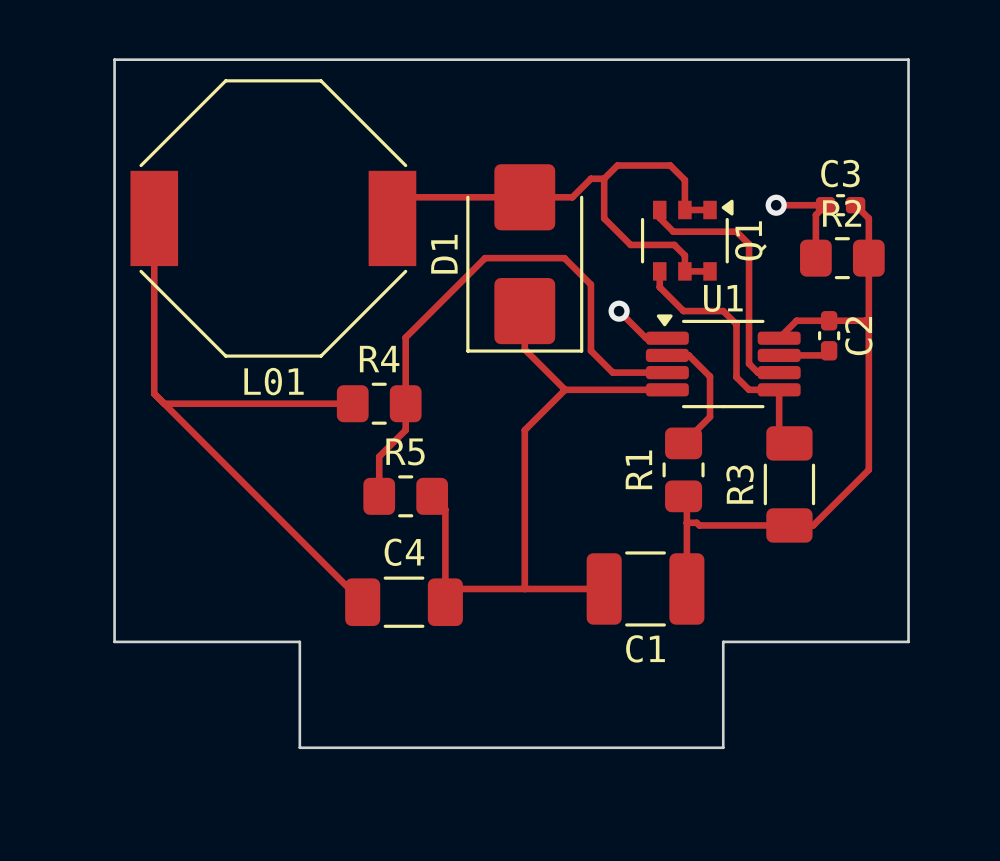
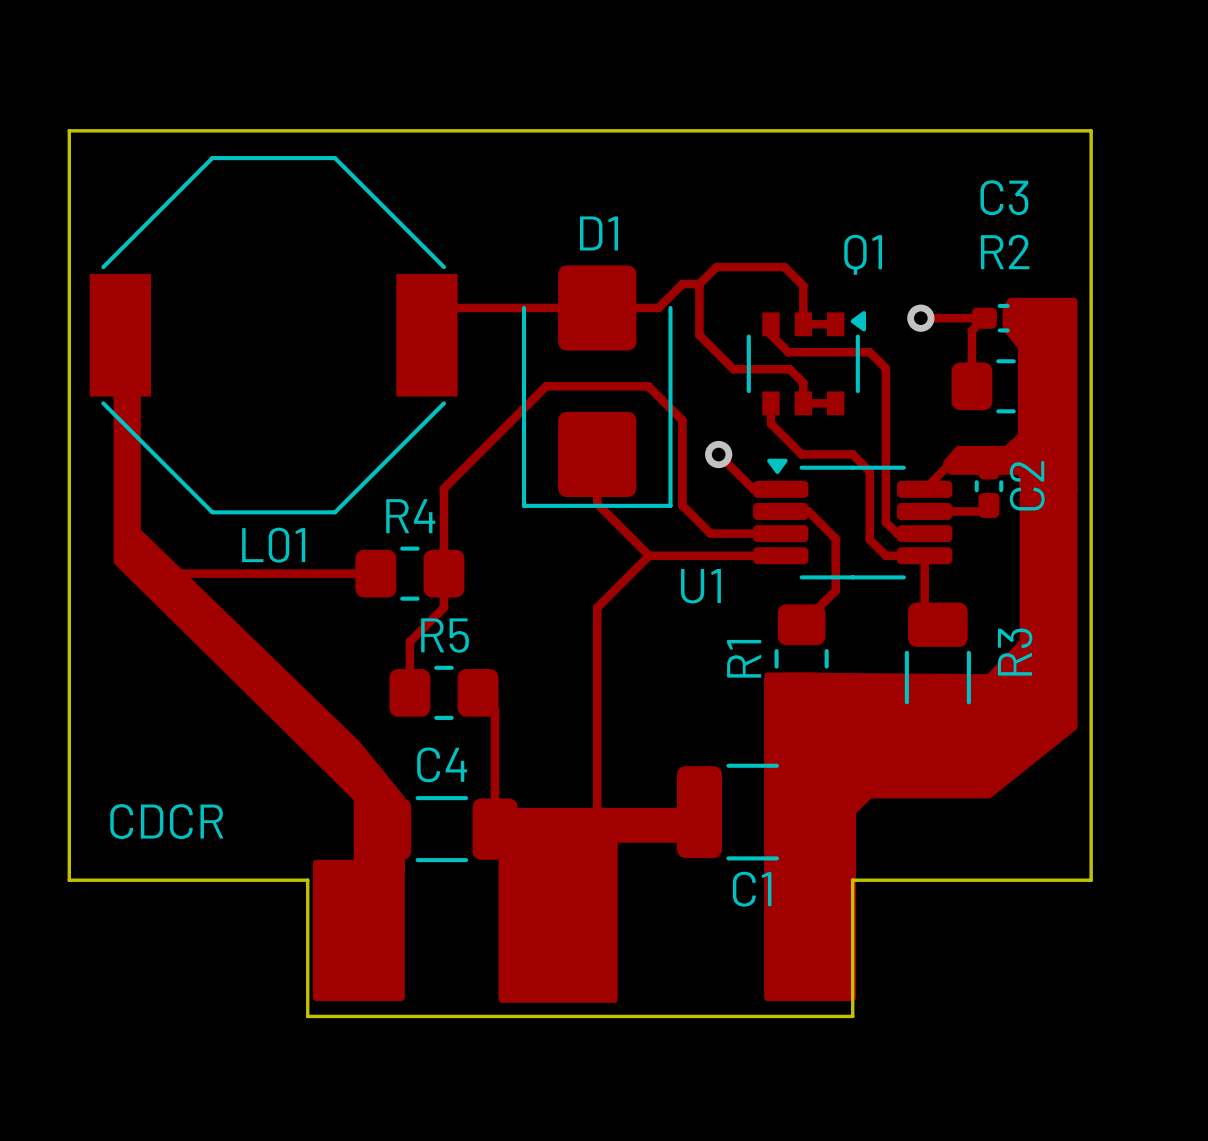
C3 name position: C3 (840, 173) -> C3 (1004, 197)
drawing: none -> [764, 297, 1078, 1002]
R2 name position: R2 (842, 213) -> R2 (1005, 252)
Q1 name rotation: 0° (750, 240) -> 90° clockwise (863, 254)
Q1 name position: Q1 (750, 240) -> Q1 (863, 254)
D1 name rotation: 0° (444, 254) -> 90° clockwise (598, 233)
D1 name position: D1 (444, 254) -> D1 (598, 233)
drawing: none -> [113, 389, 405, 1002]
U1 name position: U1 (723, 298) -> U1 (700, 586)
R3 name position: R3 (740, 484) -> R3 (1015, 652)
drawing: none -> [498, 810, 681, 1003]
text: none -> CDCR (166, 821)

